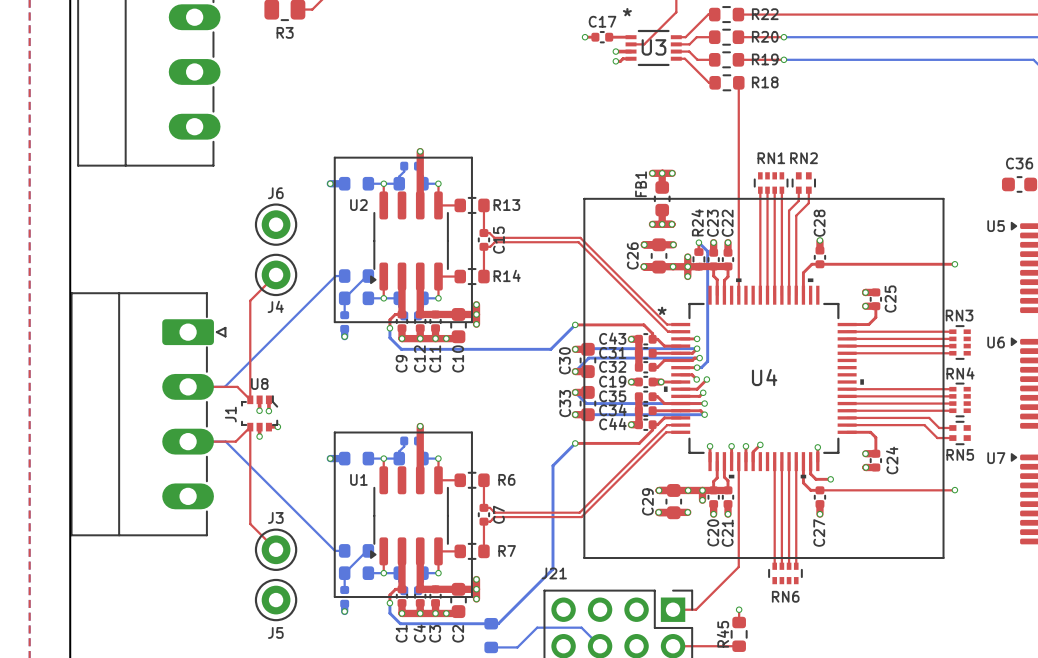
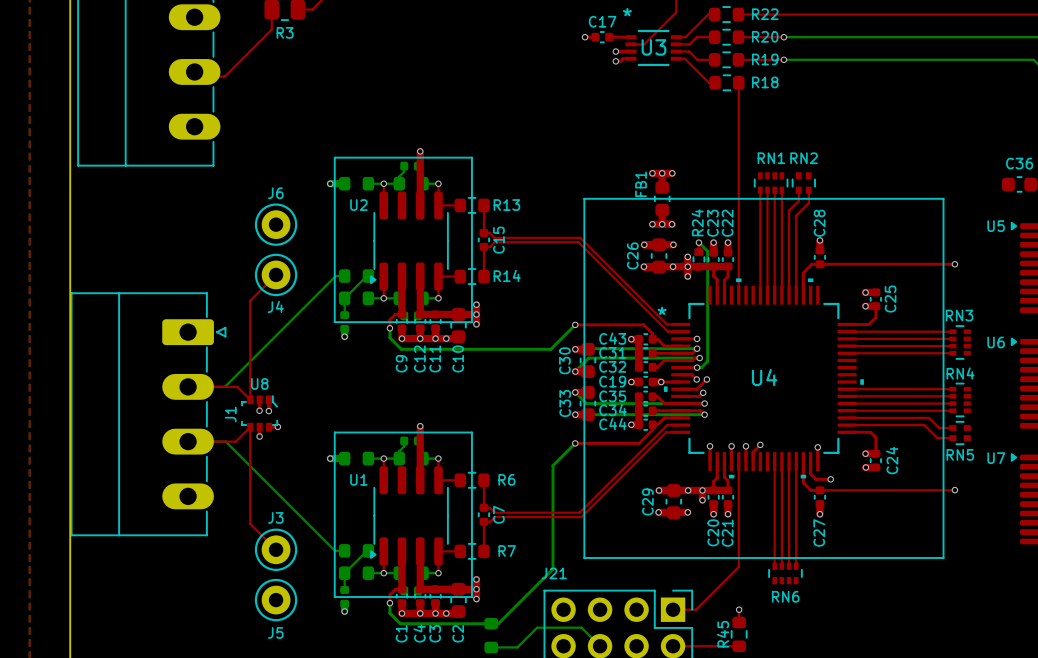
top track: none -> (271, 9) (271, 29) (224, 77) (194, 76)

